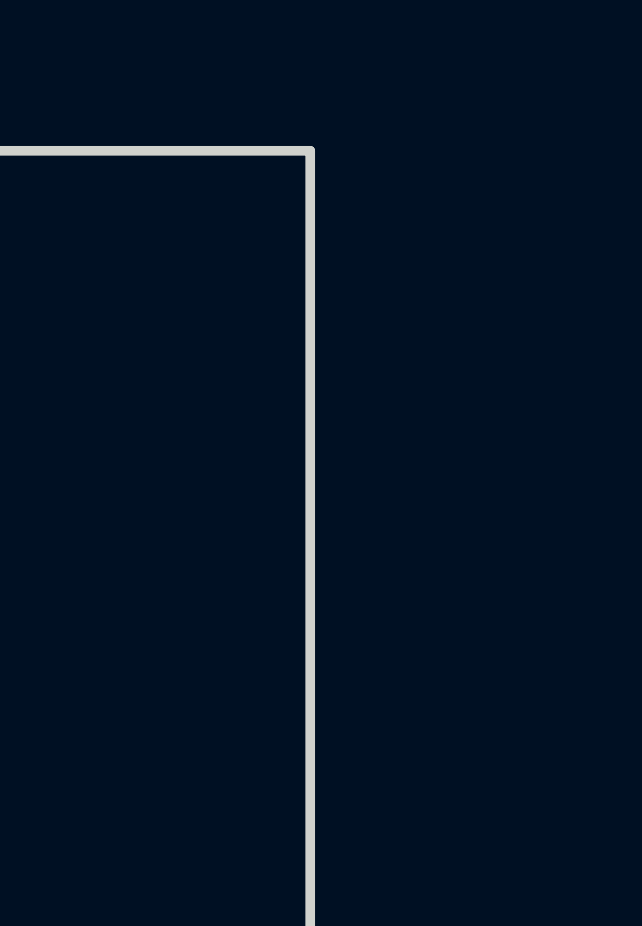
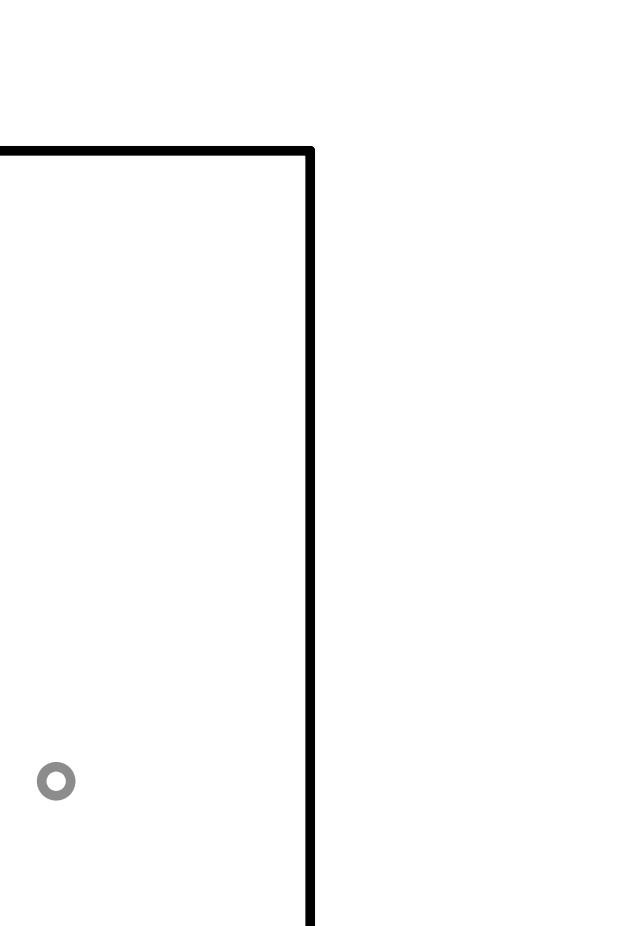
via: none -> (56, 781)

